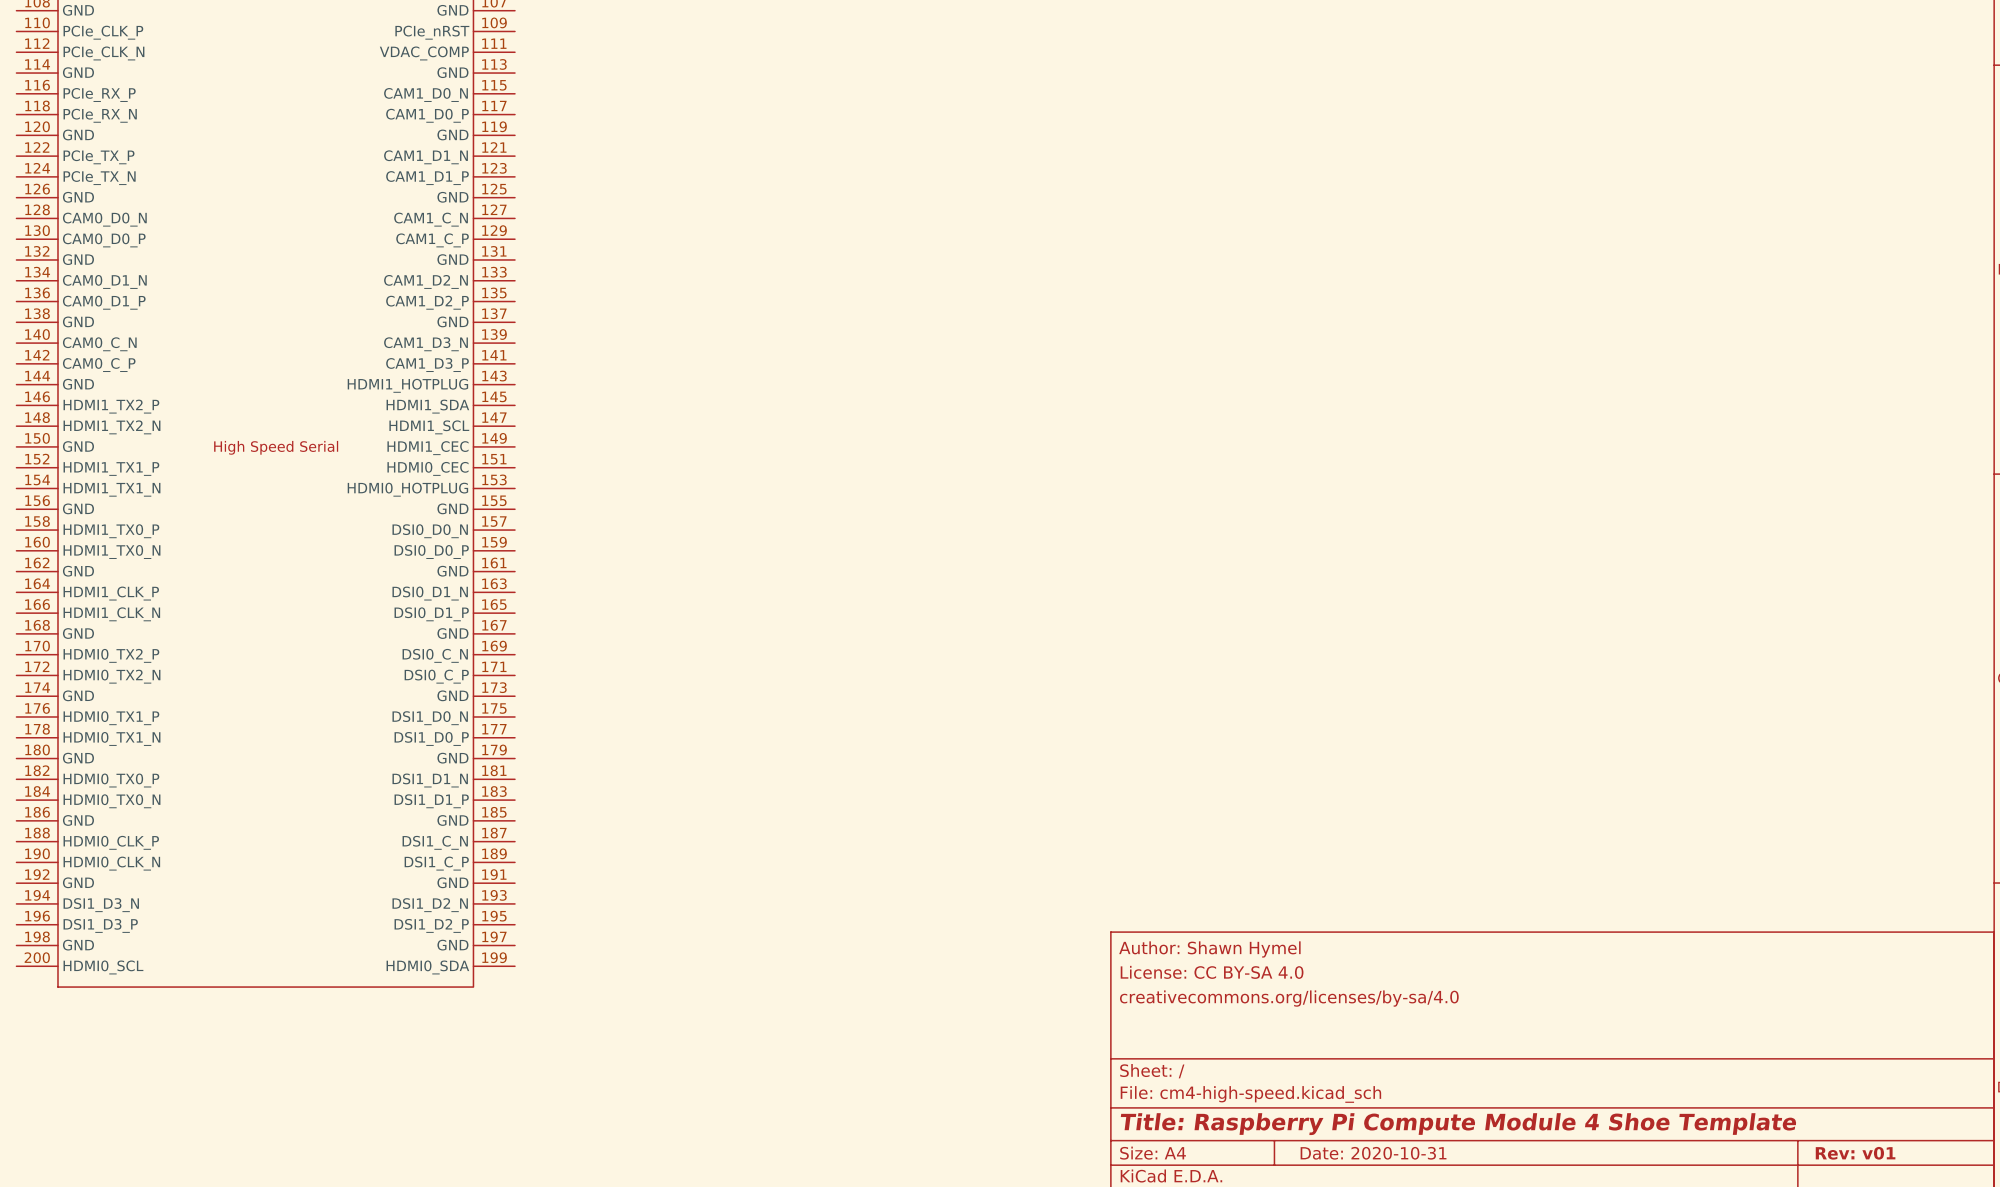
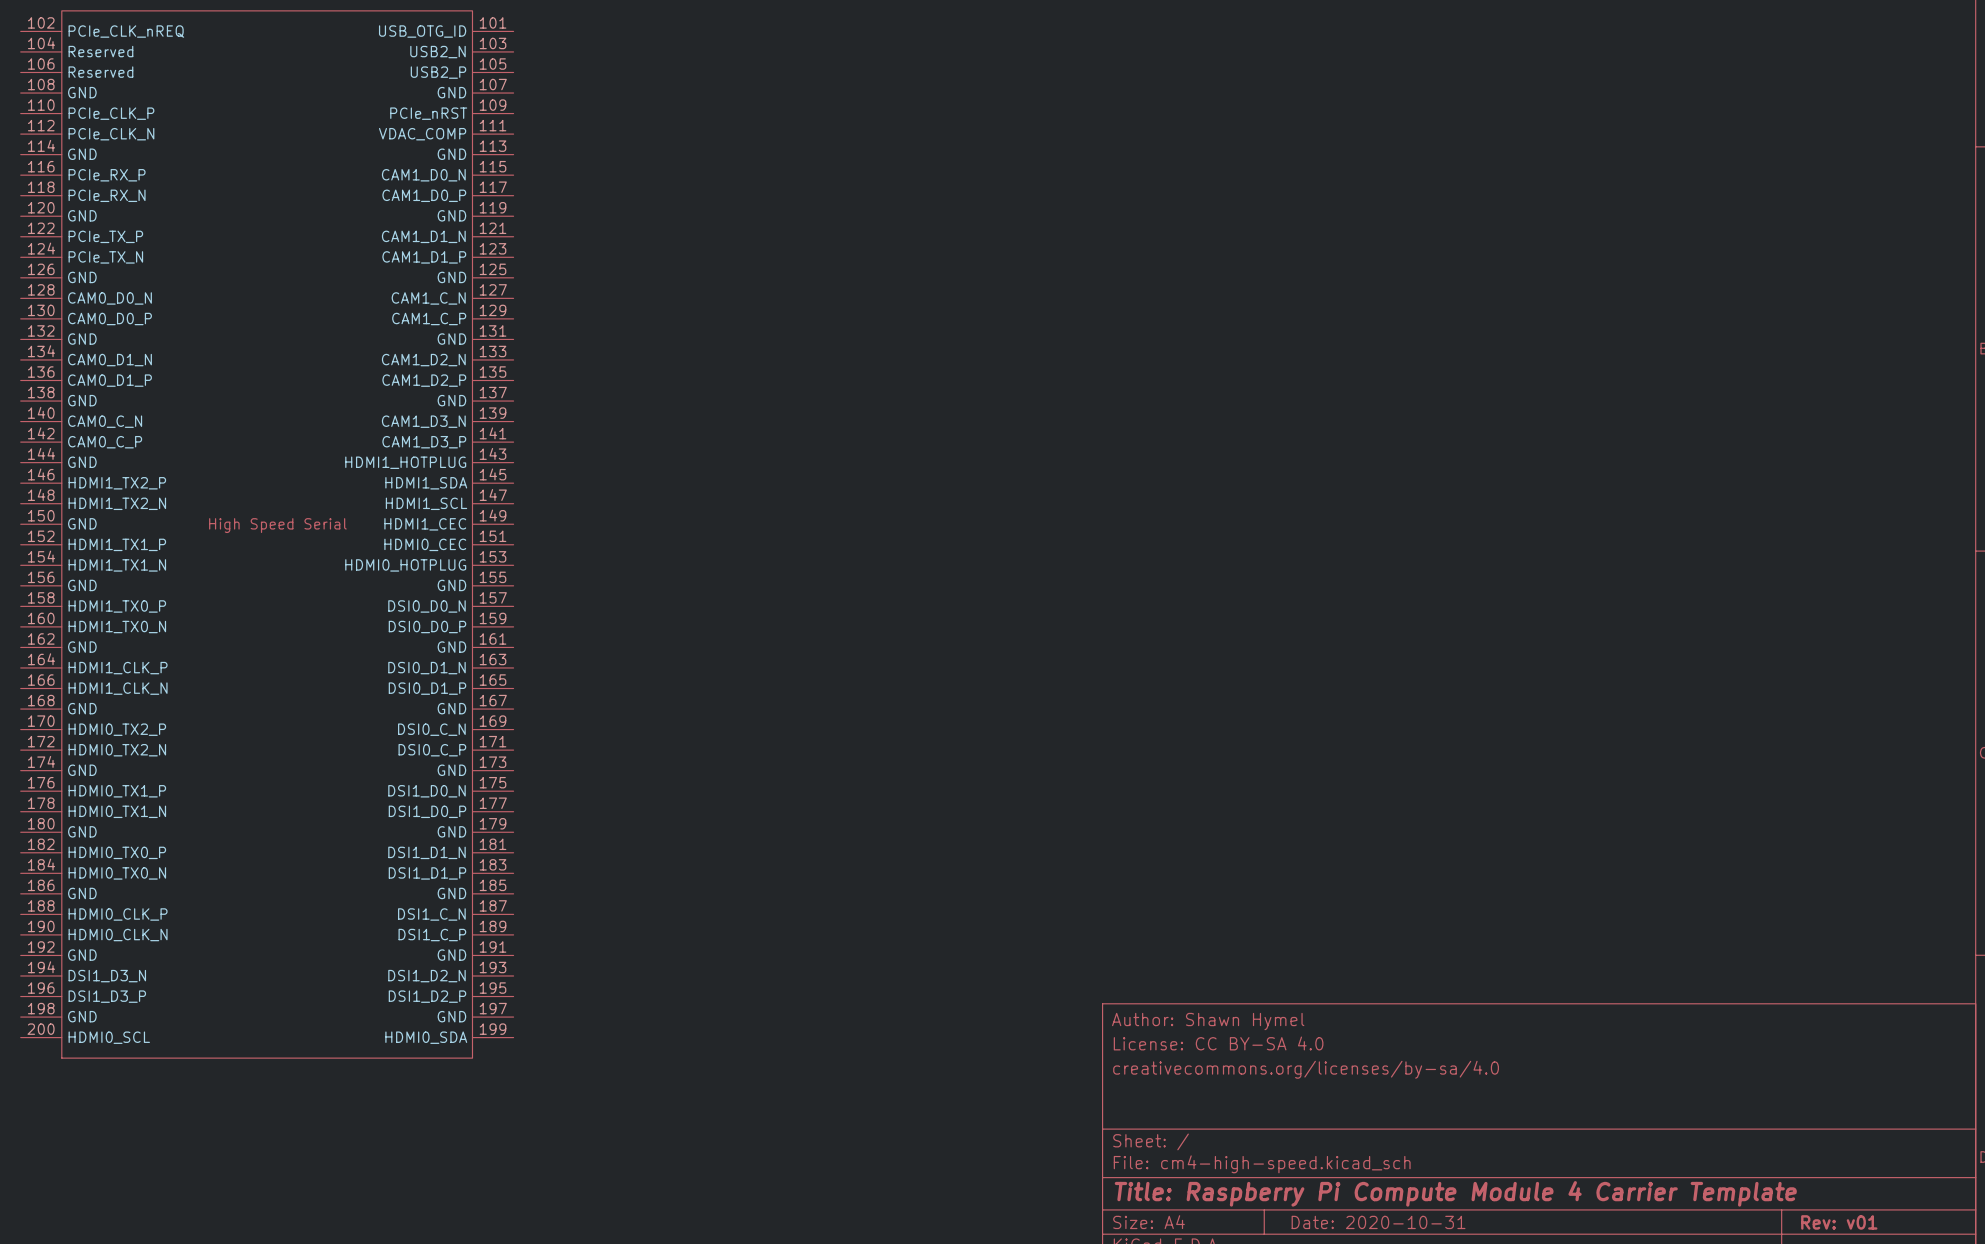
title block: Title: Raspberry Pi Compute Module 4 Shoe Template (1458, 1124) -> Title: Raspberry Pi Compute Module 4 Carrier Template (1455, 1193)

